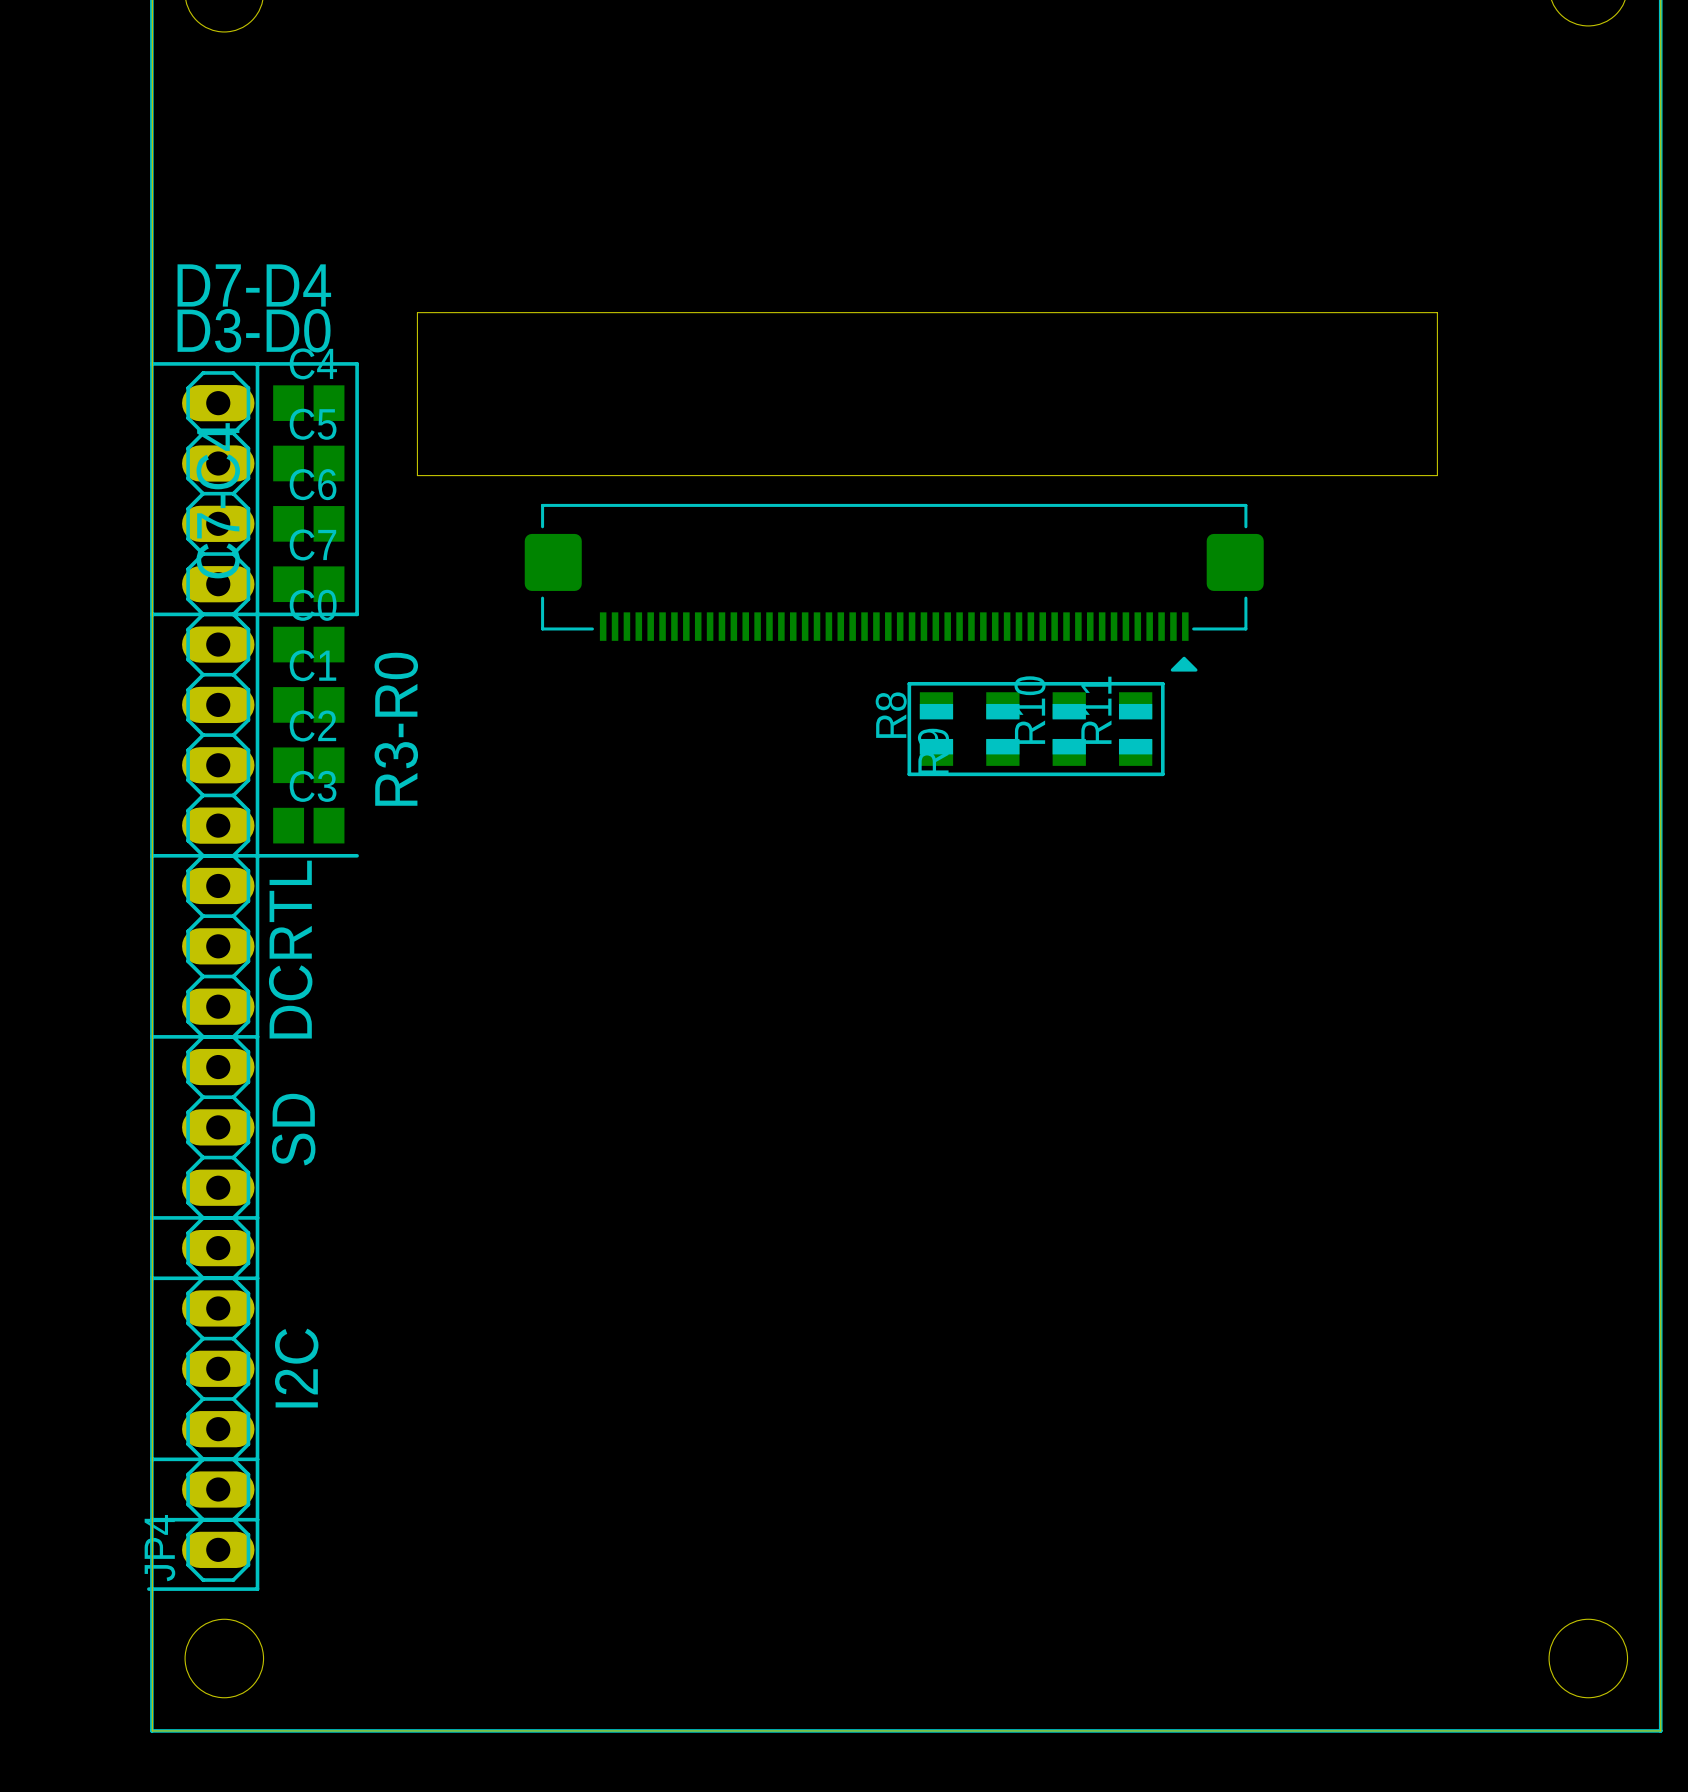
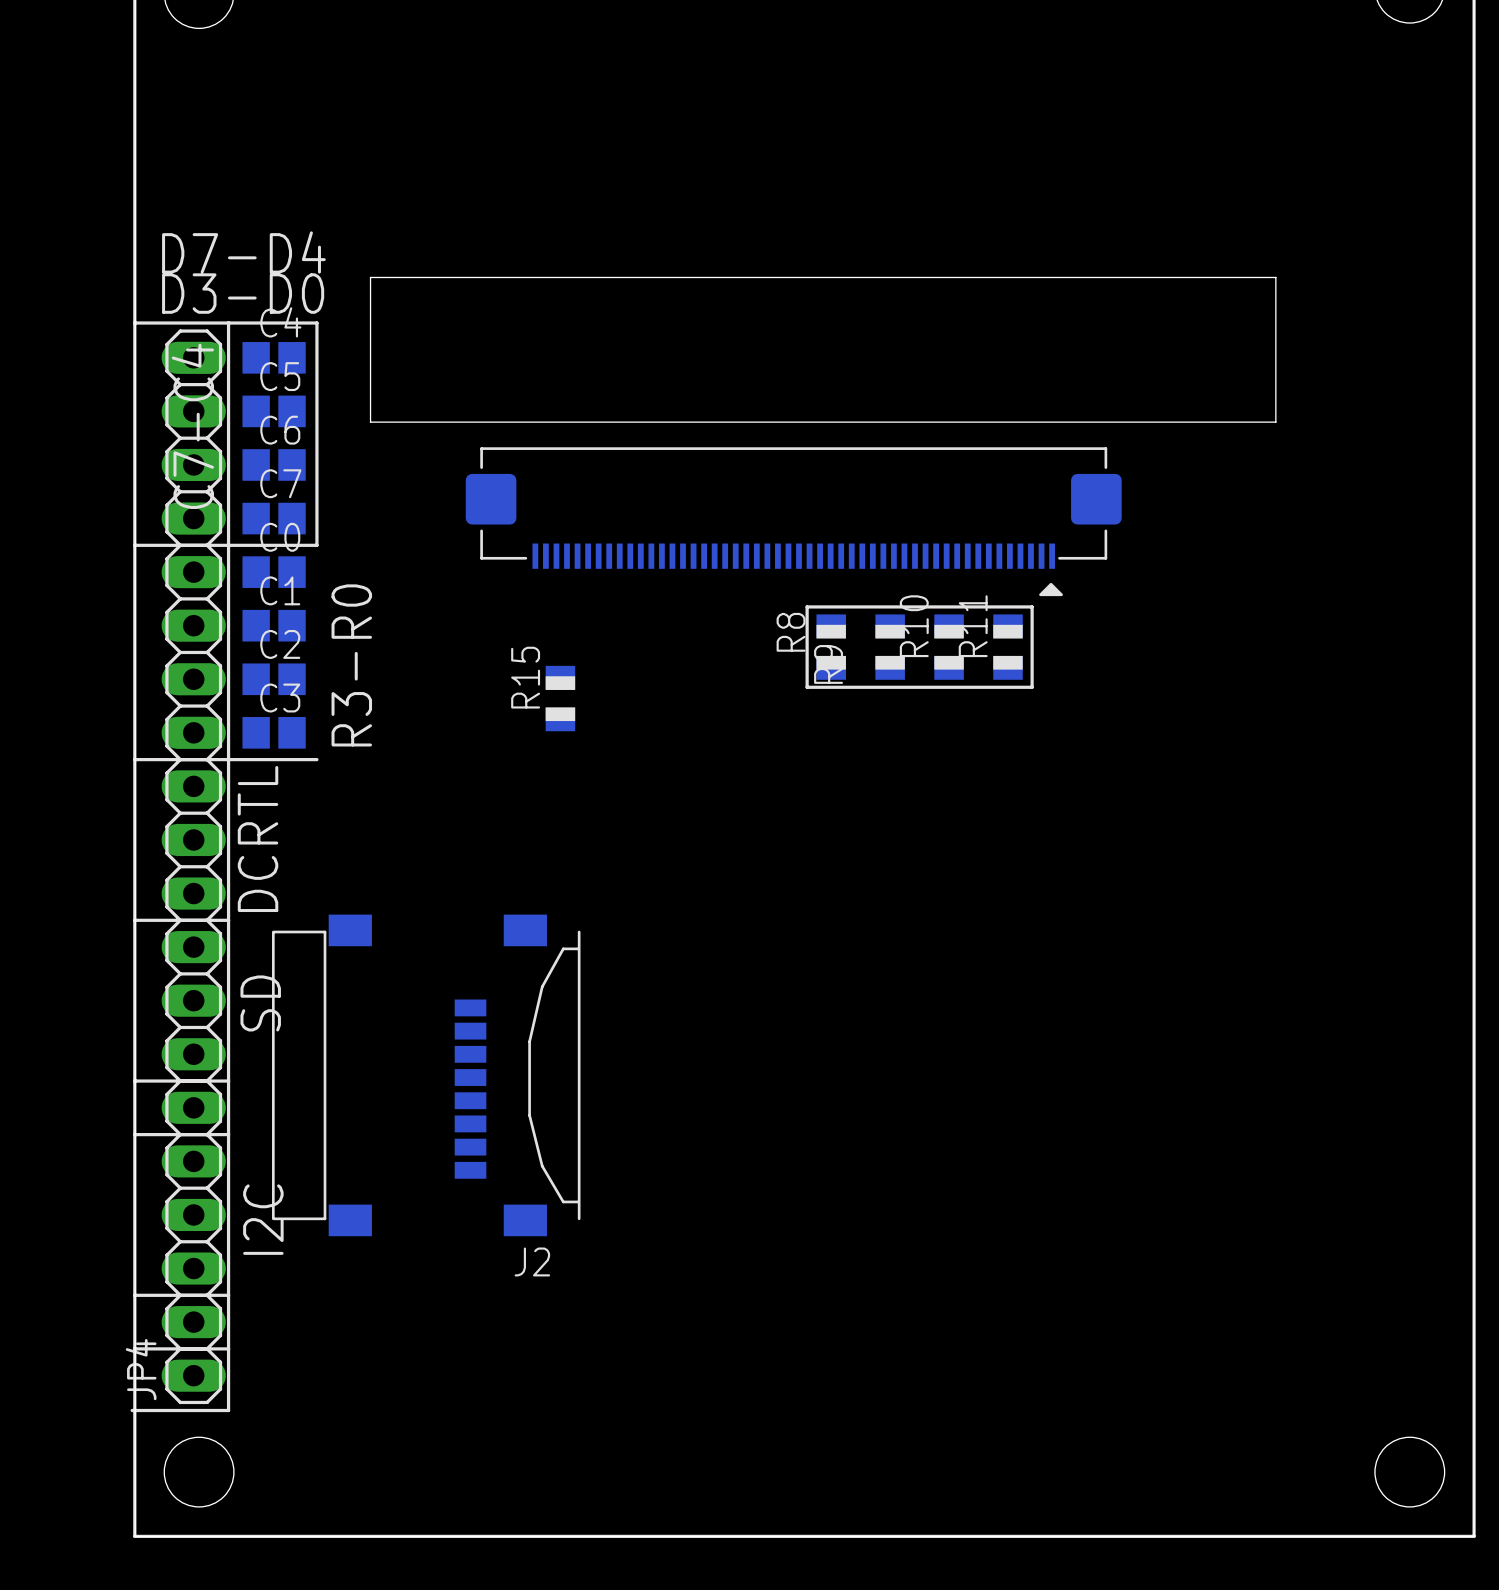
R15: none -> (560, 698)
J2: none -> (426, 1075)

